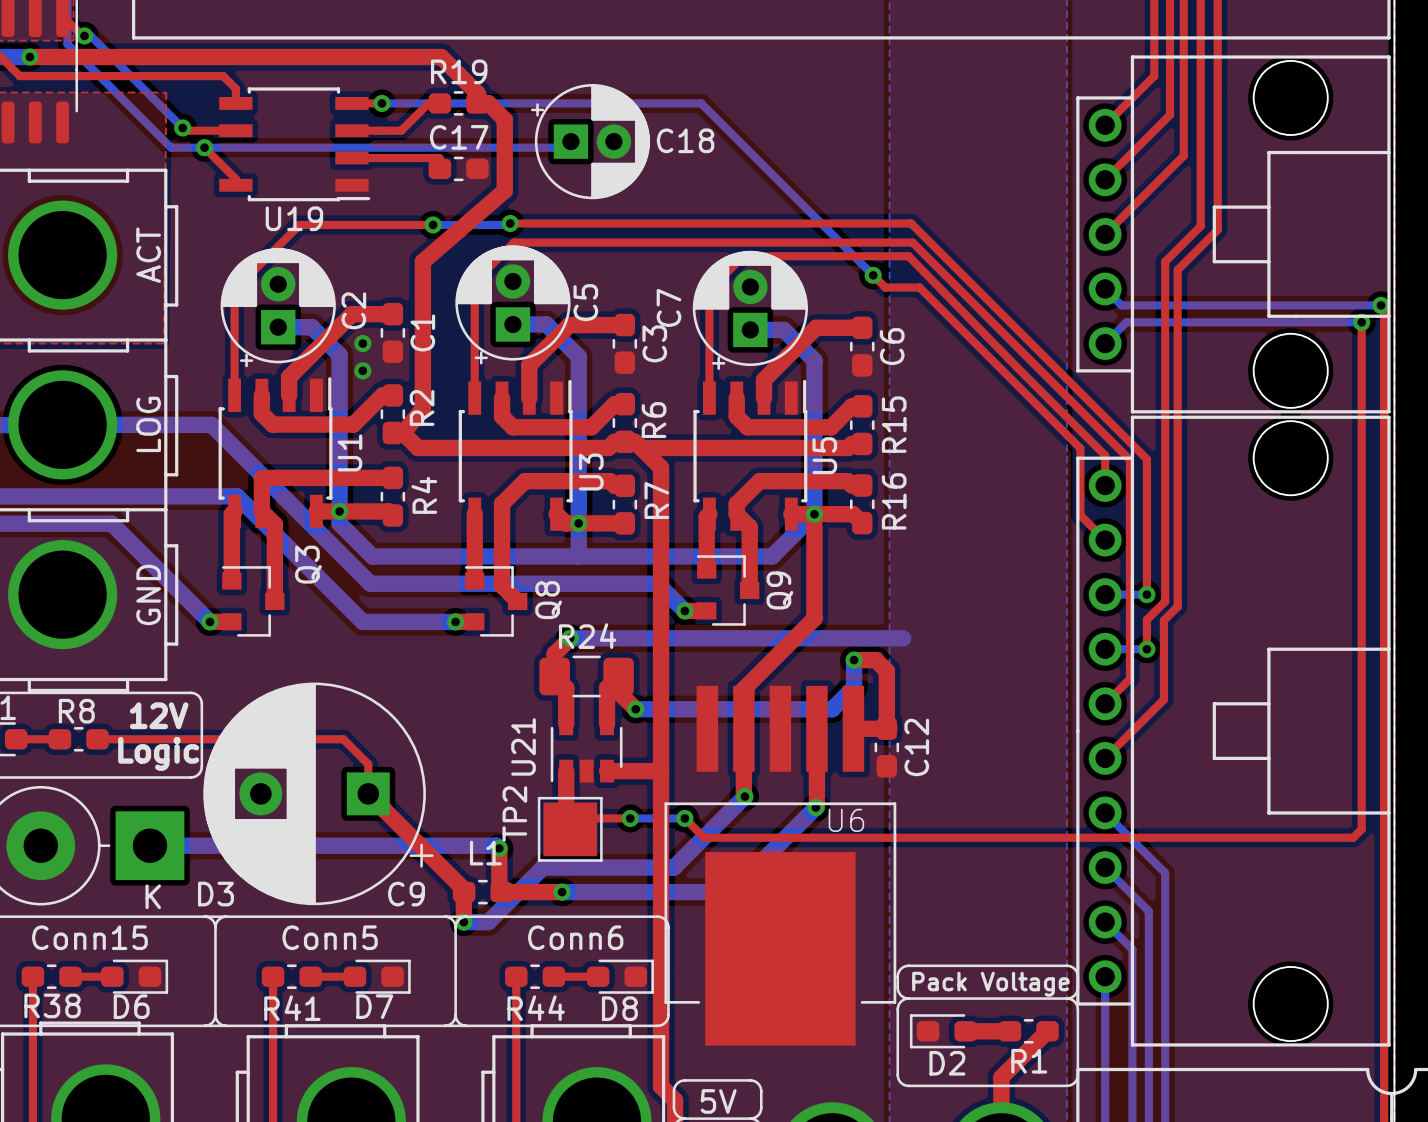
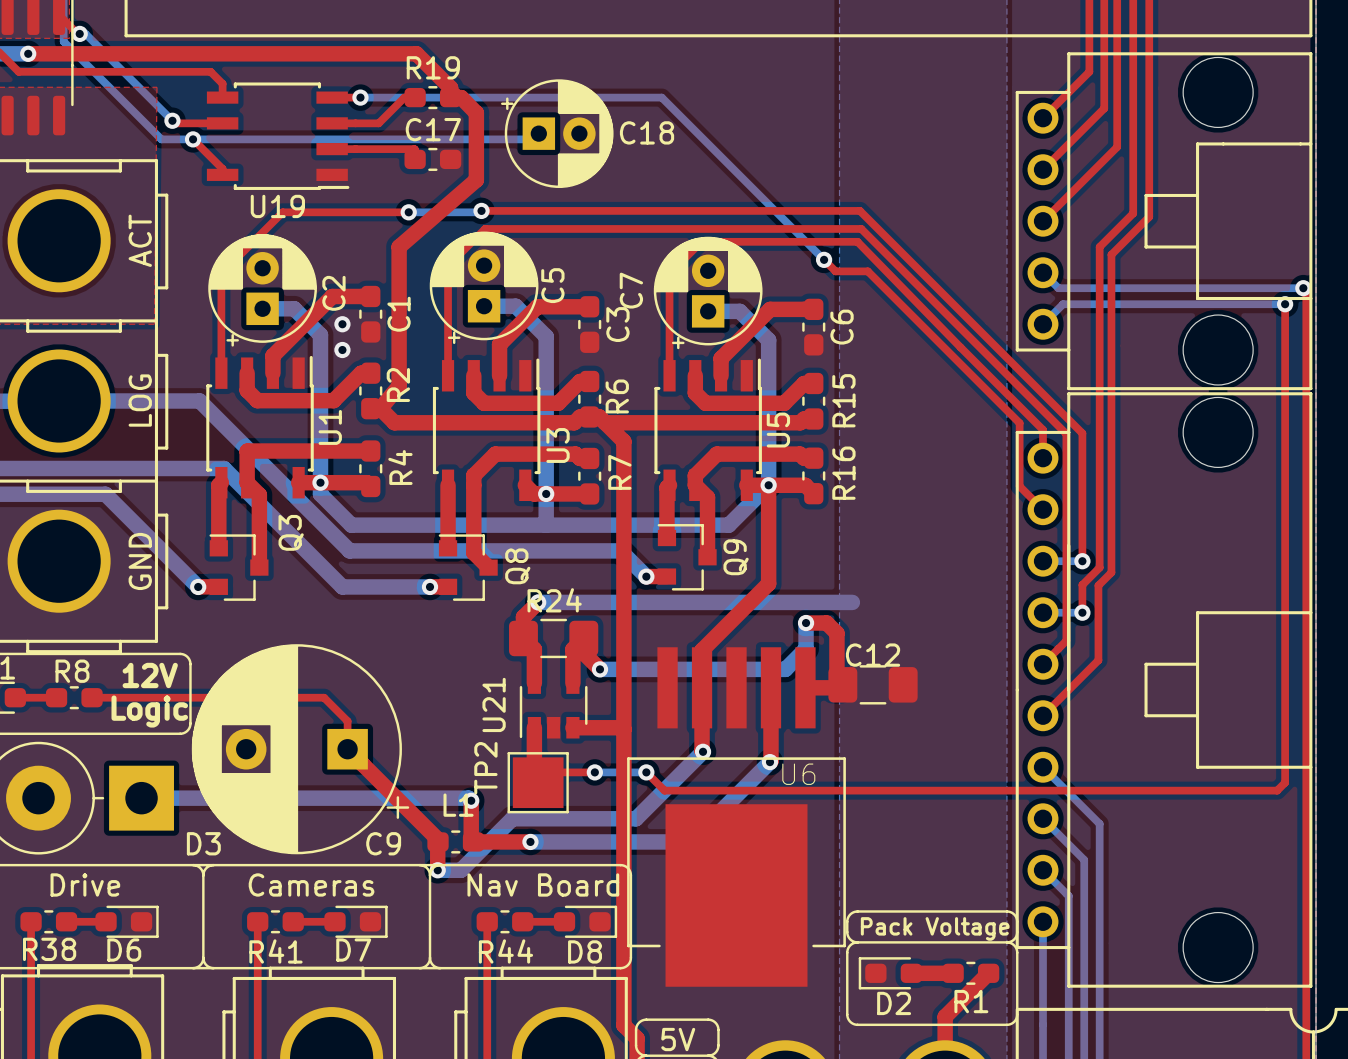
C12 footprint: [874, 717, 900, 778] -> [828, 665, 918, 705]
C12 name position: C12 (916, 747) -> C12 (873, 655)
D3 text: K (153, 896) -> none
Conn15 name: Conn15 (89, 937) -> Drive (85, 884)
Conn5 name: Conn5 (330, 937) -> Cameras (311, 884)
Conn6 name: Conn6 (575, 937) -> Nav Board (543, 884)

